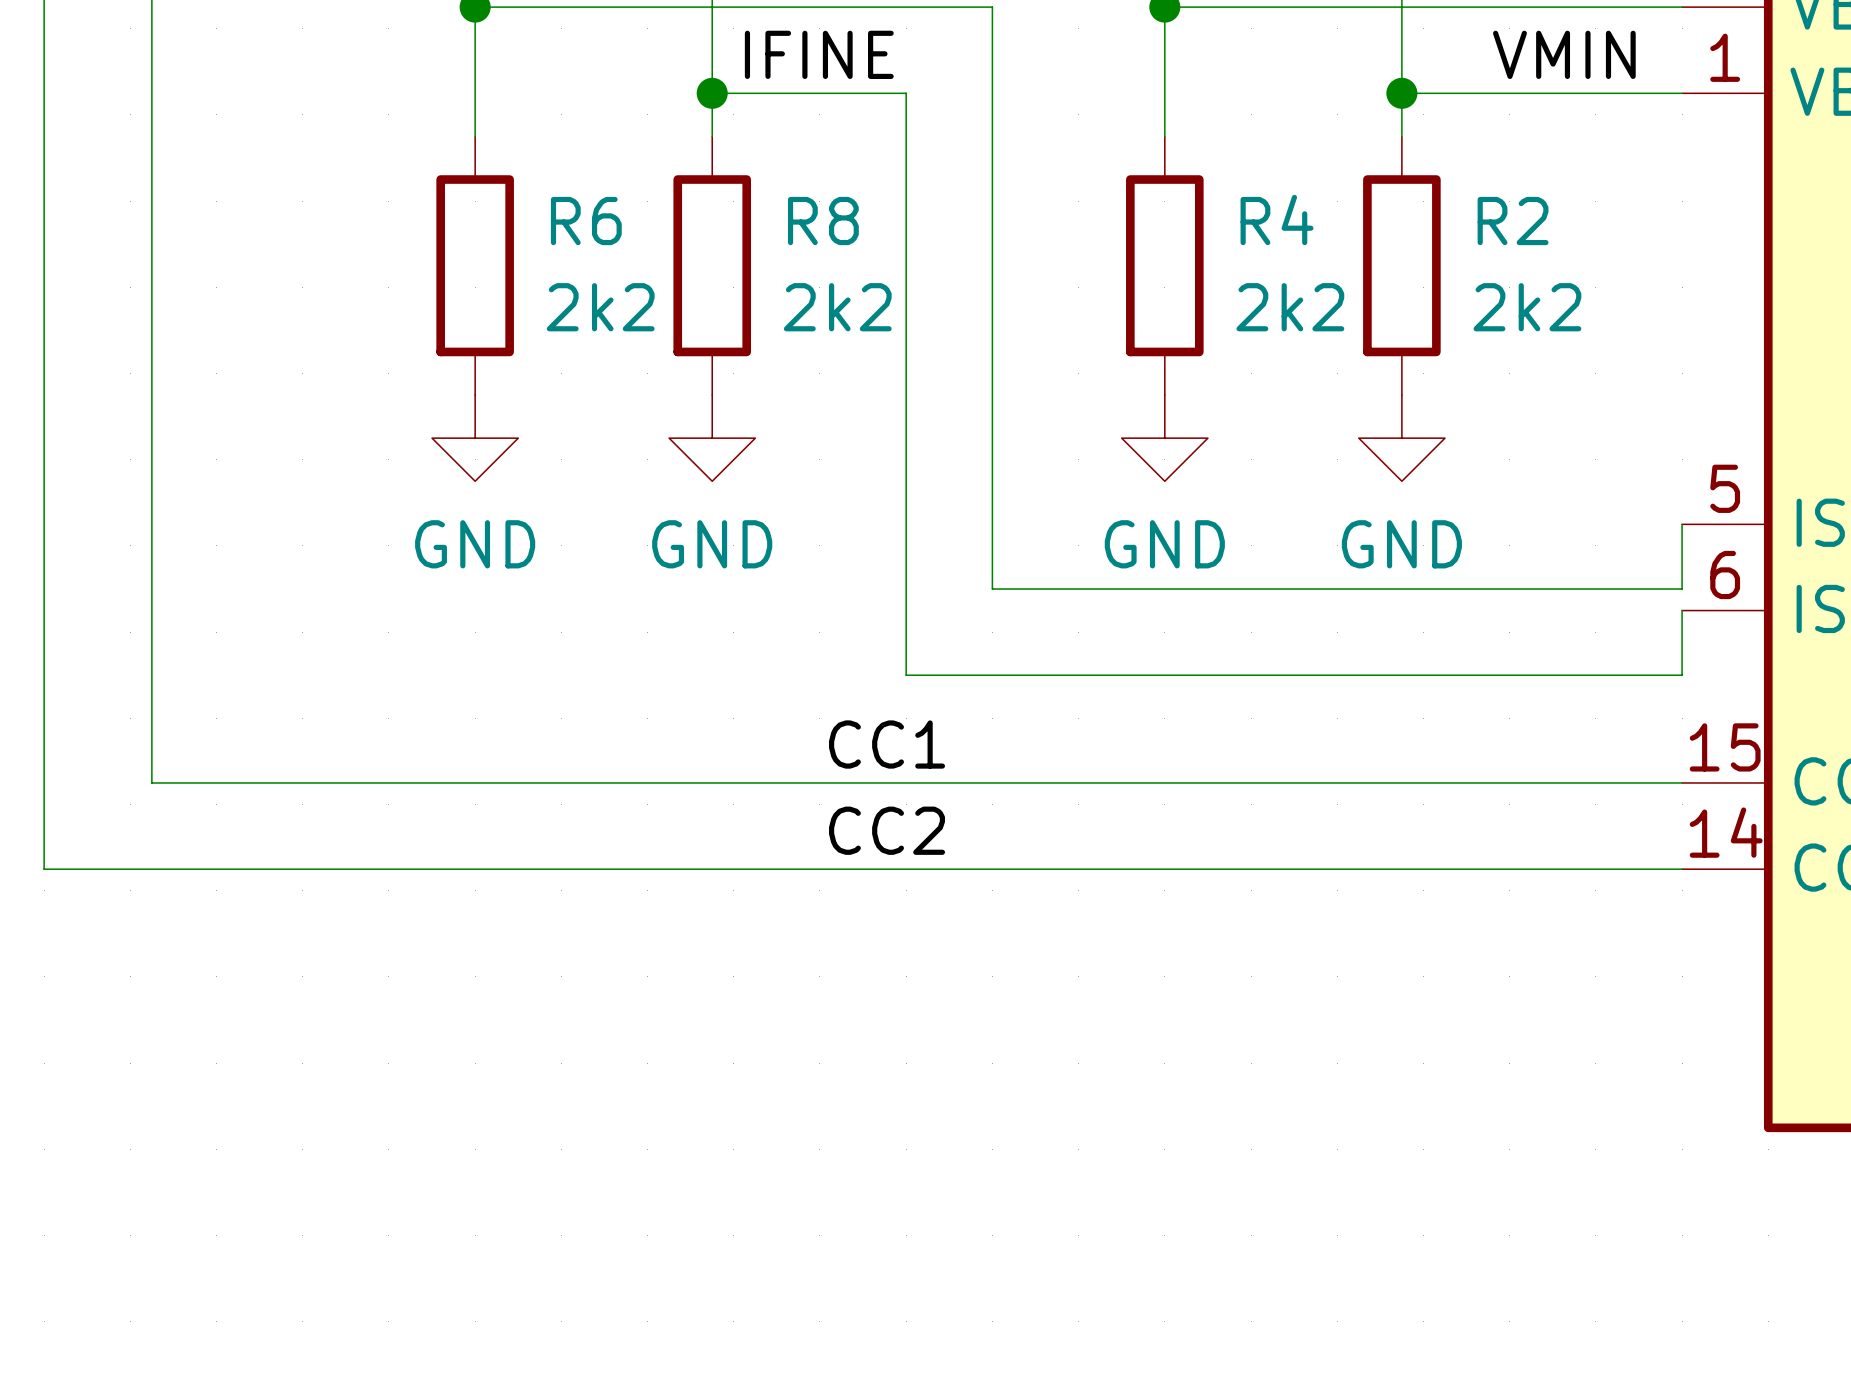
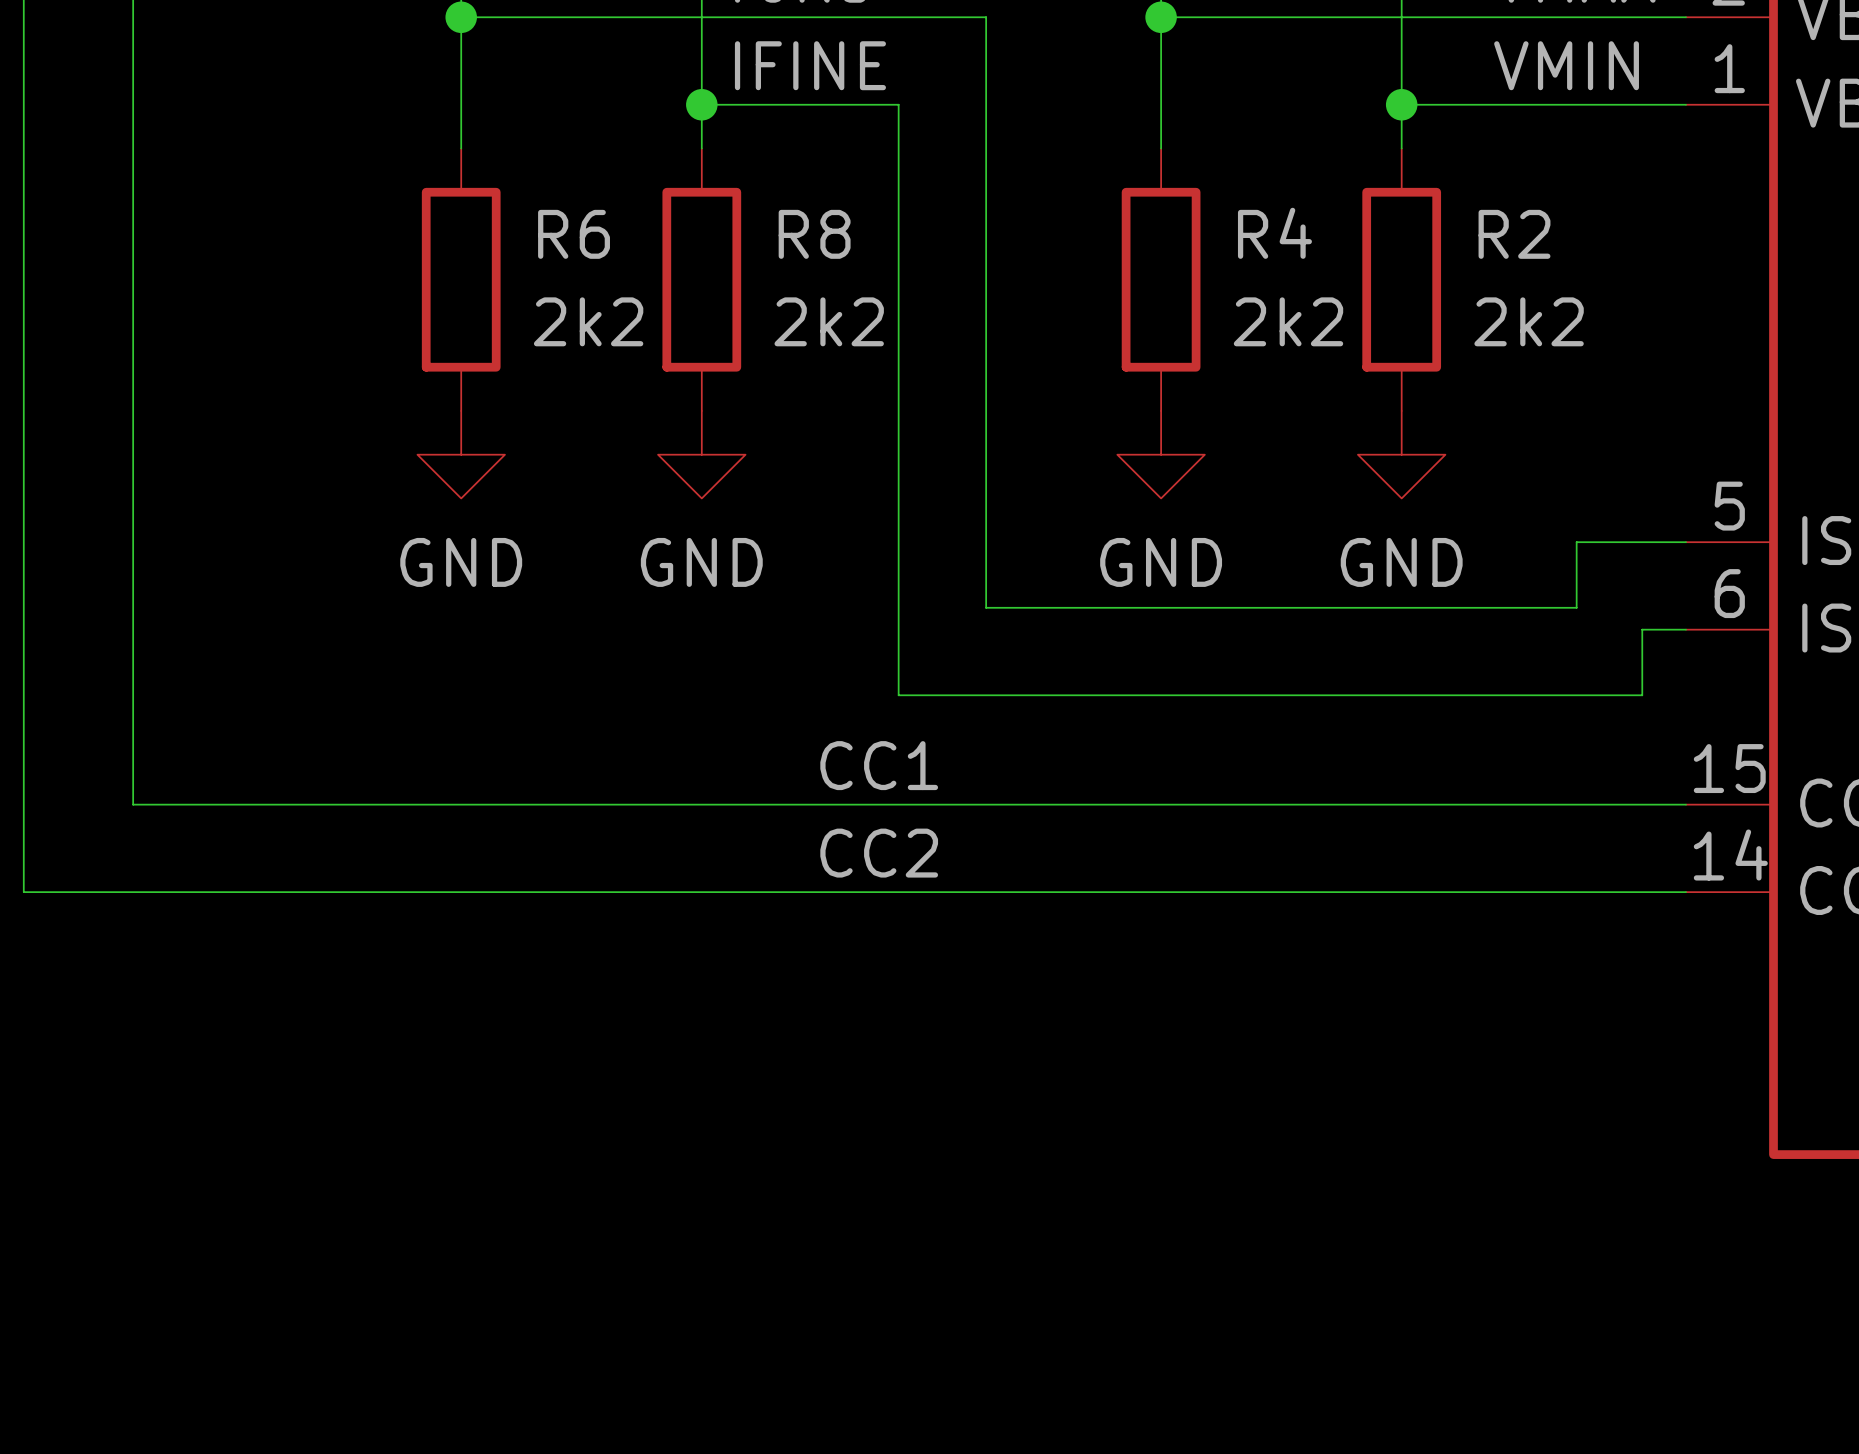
wire: (1682, 524) (1682, 589) (1574, 589) -> (1686, 542) (1576, 542) (1576, 607)
wire: (1682, 610) (1682, 675) (1638, 675) -> (1686, 629) (1642, 629) (1642, 695)

